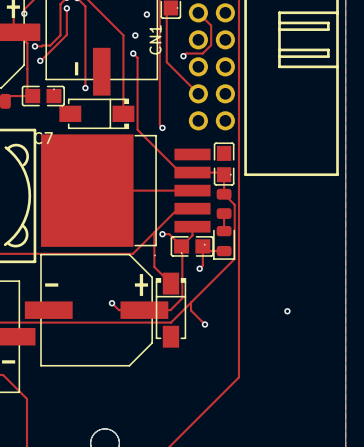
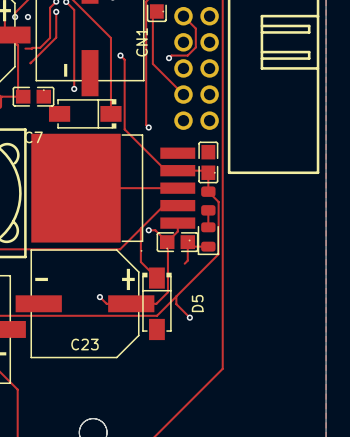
via: none -> (27, 17)
via: (146, 14) -> none
via: (135, 35) -> none
via: (34, 46) -> none
via: (40, 60) -> none
via: (199, 268) -> none
D5 name: none -> D5 (197, 303)
via: (287, 311) -> none
C23 name: none -> C23 (85, 344)

